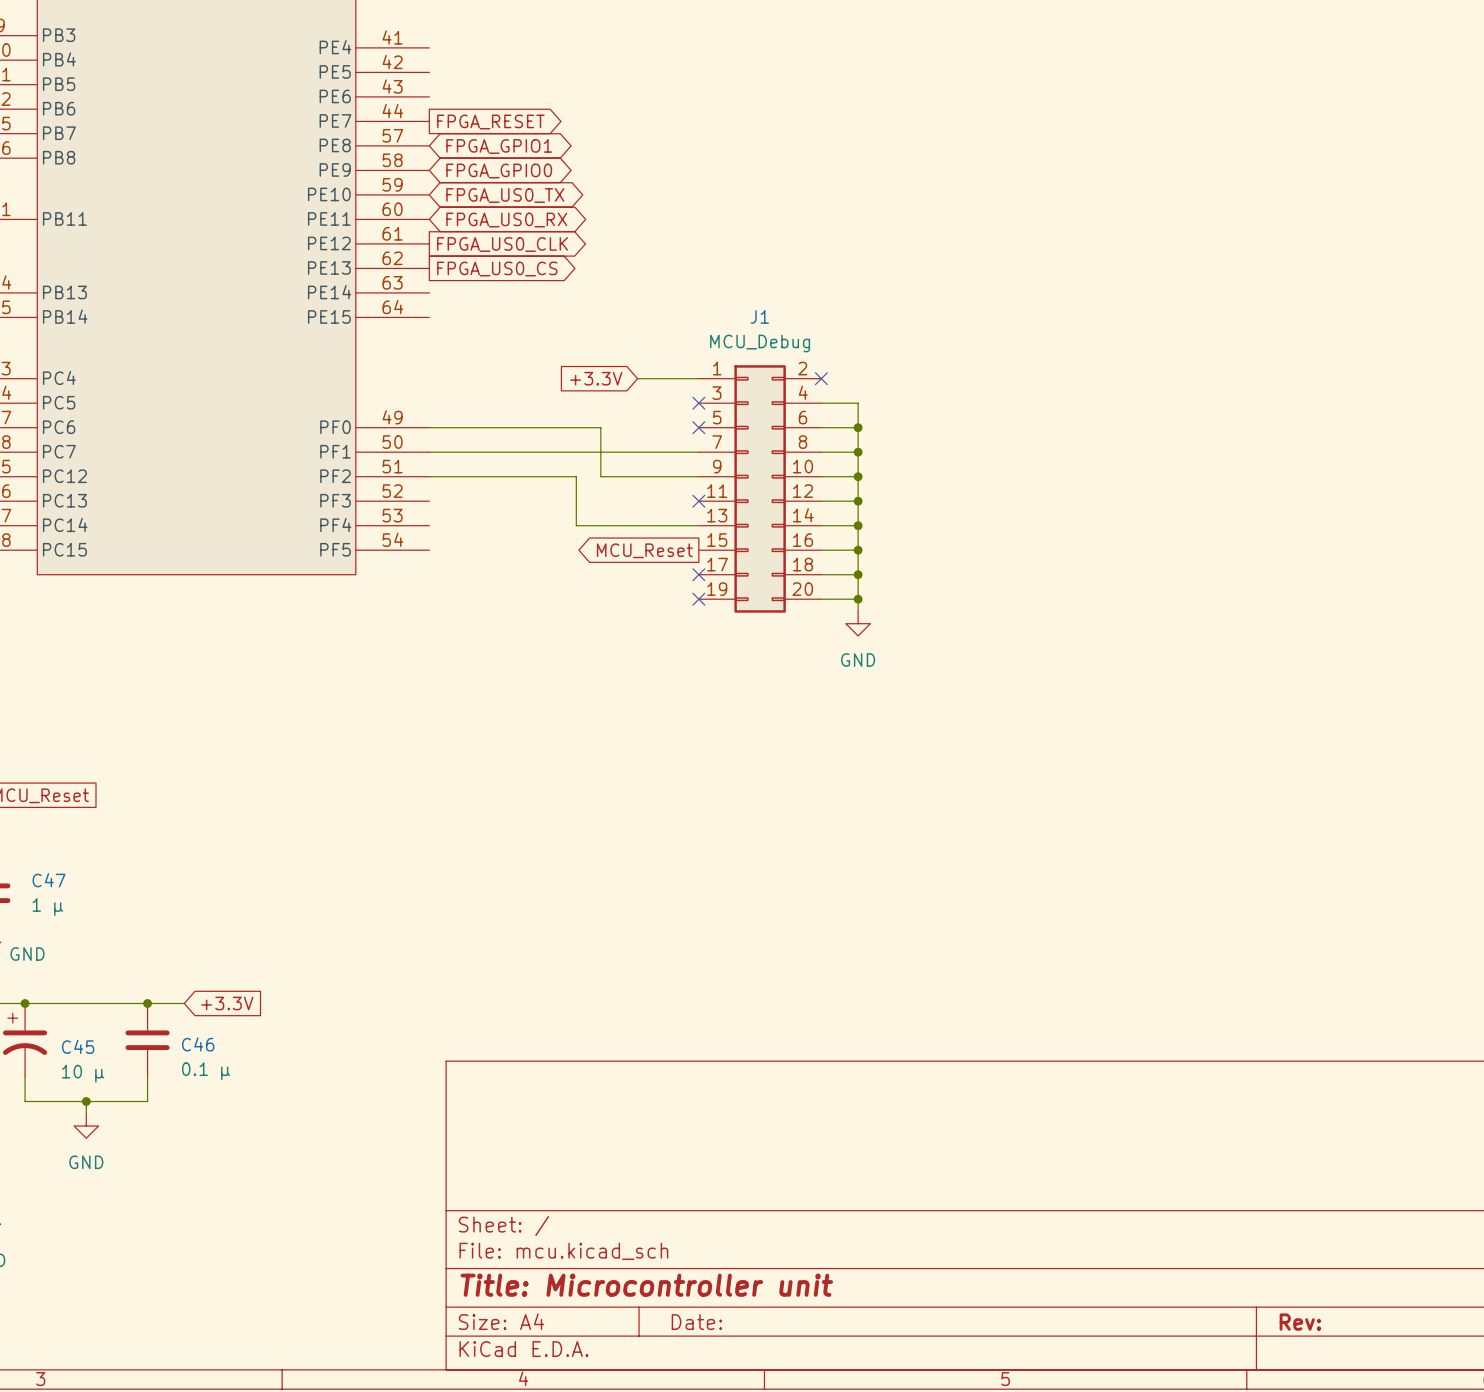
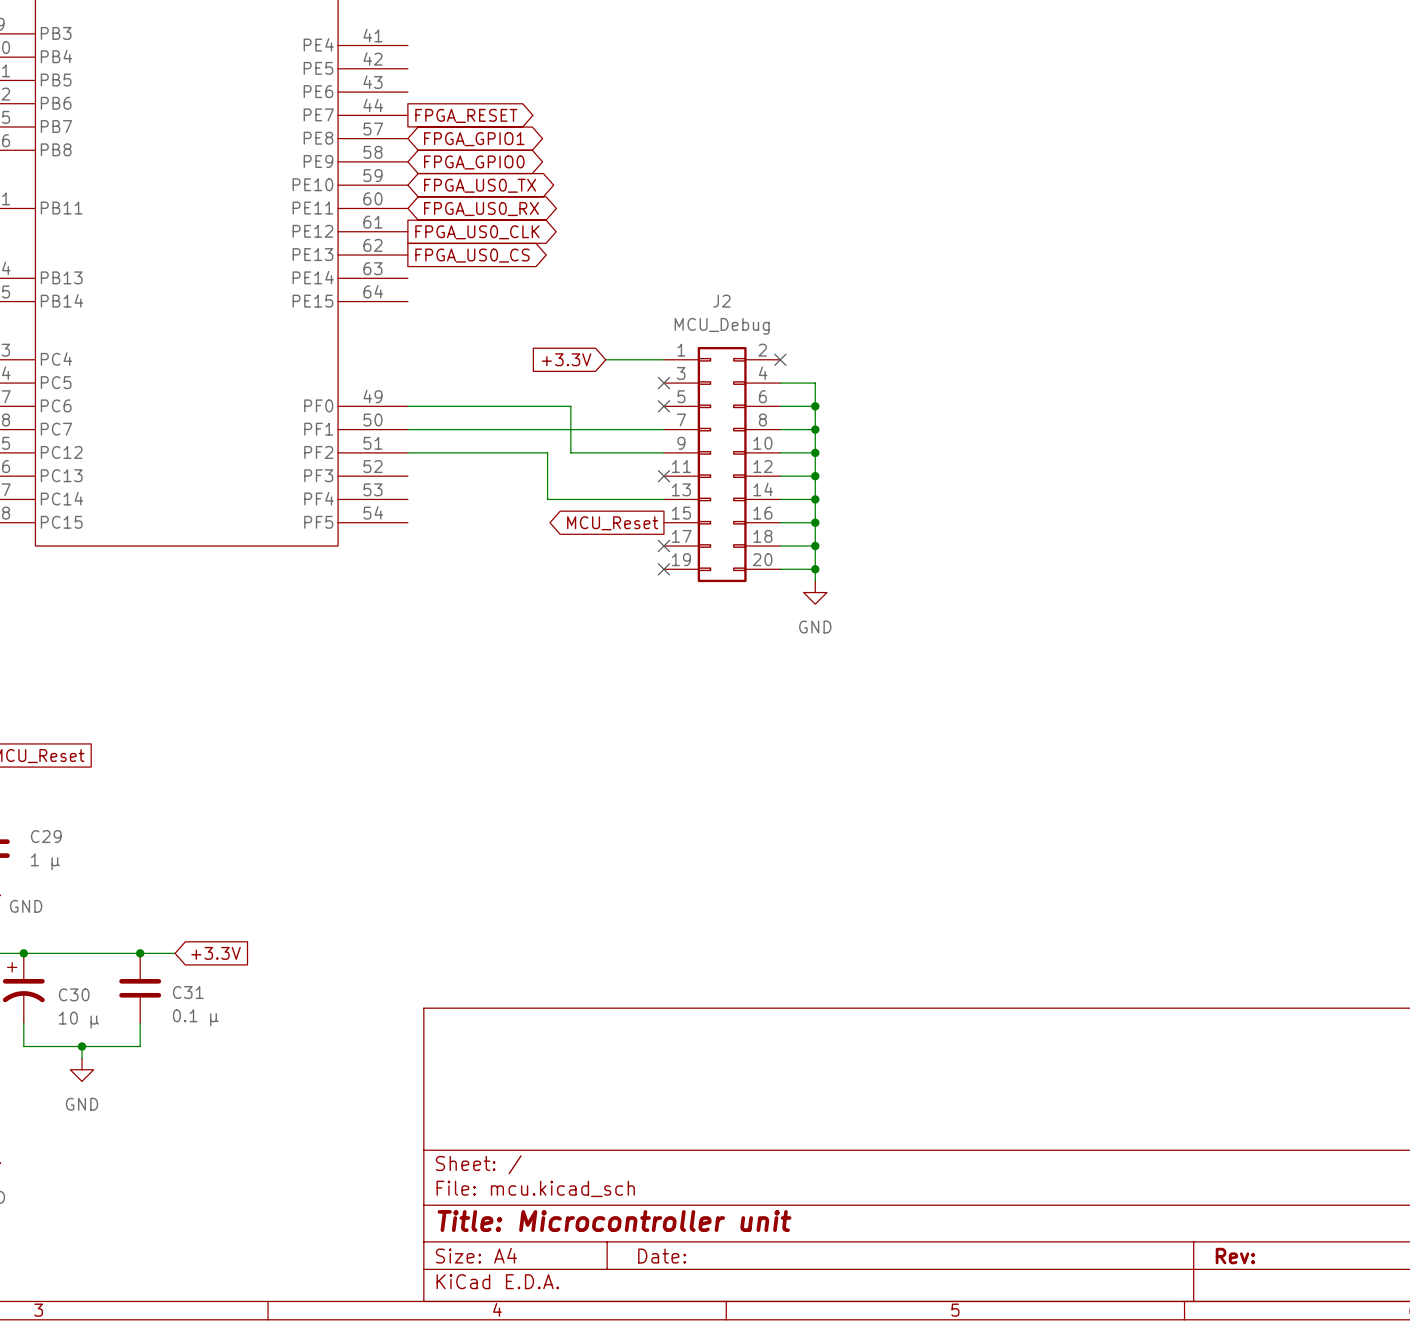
J1 name: J1 (759, 316) -> J2 (721, 301)
C47 name: C47 (49, 880) -> C29 (46, 836)
C46 name: C46 (198, 1044) -> C31 (188, 992)
C45 name: C45 (78, 1046) -> C30 (74, 994)

